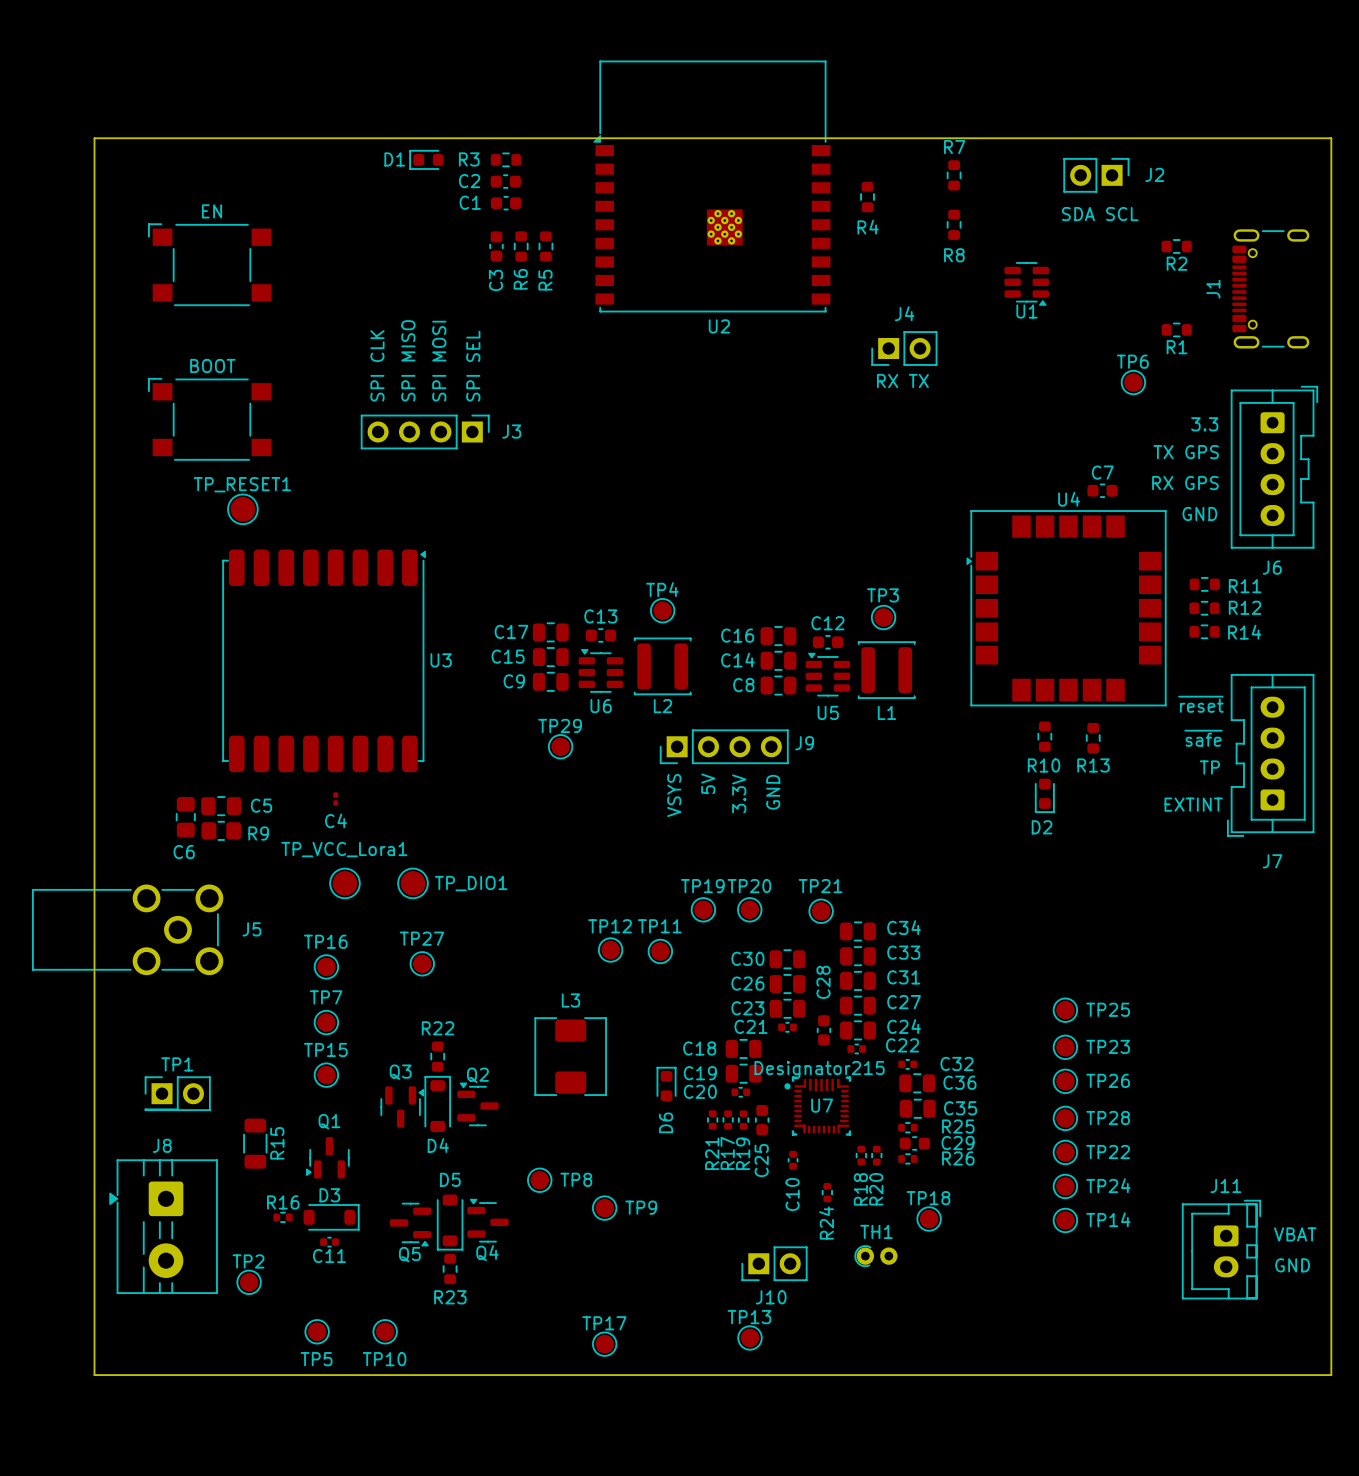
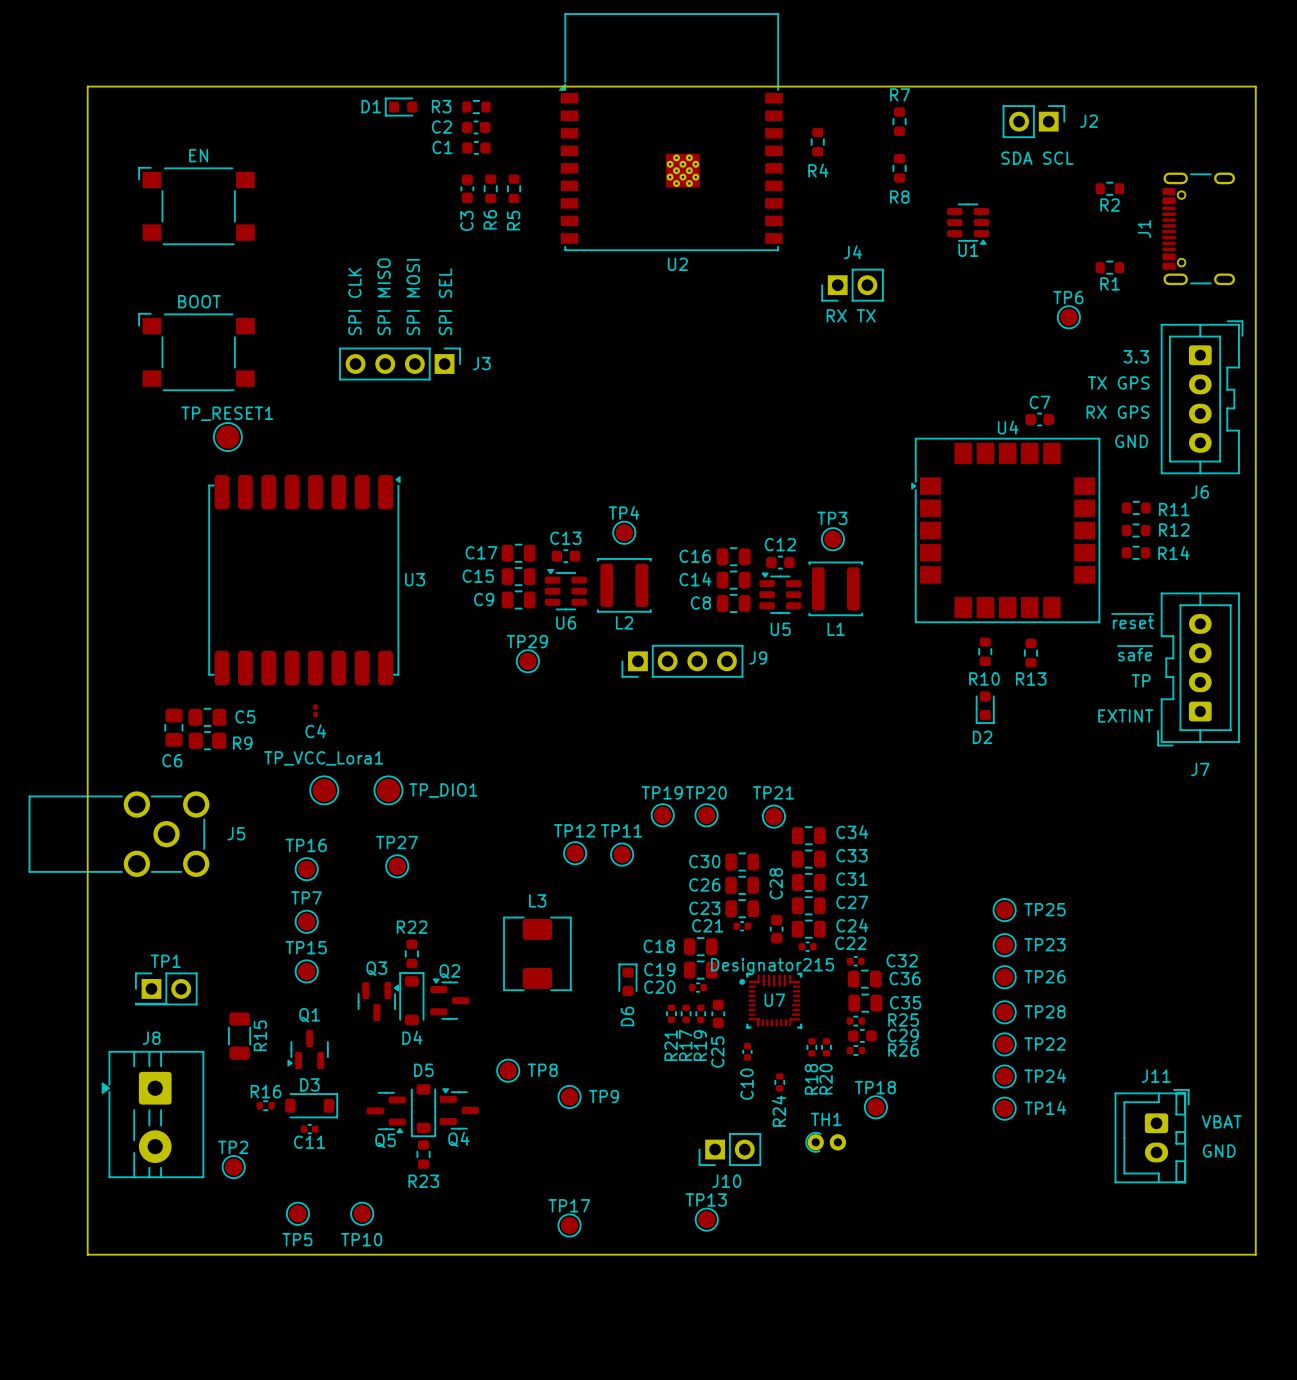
text: 5V (708, 783) -> none
text: GND (773, 792) -> none
text: 3.3V (739, 793) -> none
text: VSYS (674, 795) -> none

